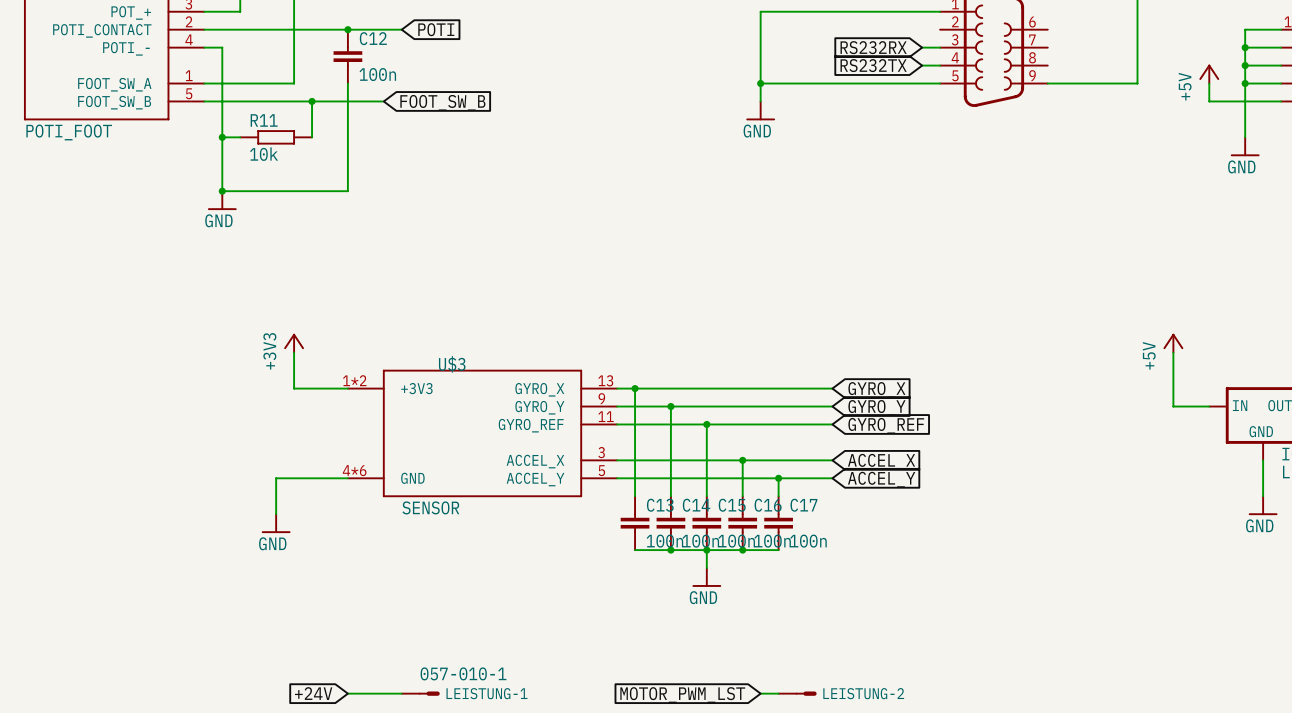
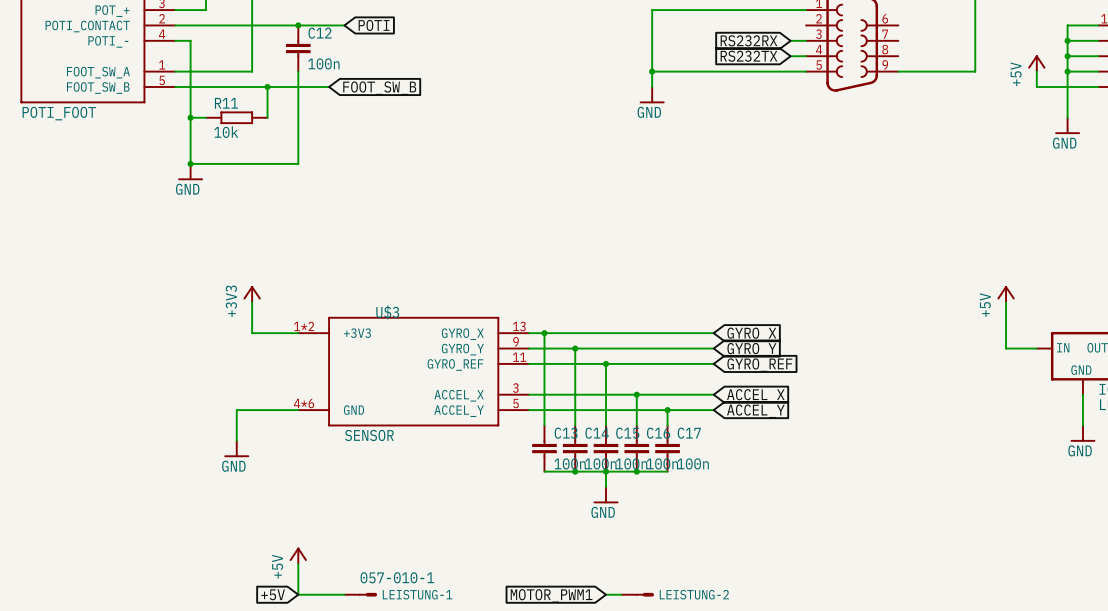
power symbol: none -> +5V (298, 555)
wire: none -> (298, 563) (298, 594)
global label: +24V (313, 693) -> +5V (273, 594)
wire: (760, 693) (778, 693) -> (606, 594) (621, 594)
LEISTUNG-2 position: (797, 693) -> (637, 594)
global label: MOTOR_PWM_LST (682, 695) -> MOTOR_PWM1 (551, 595)

